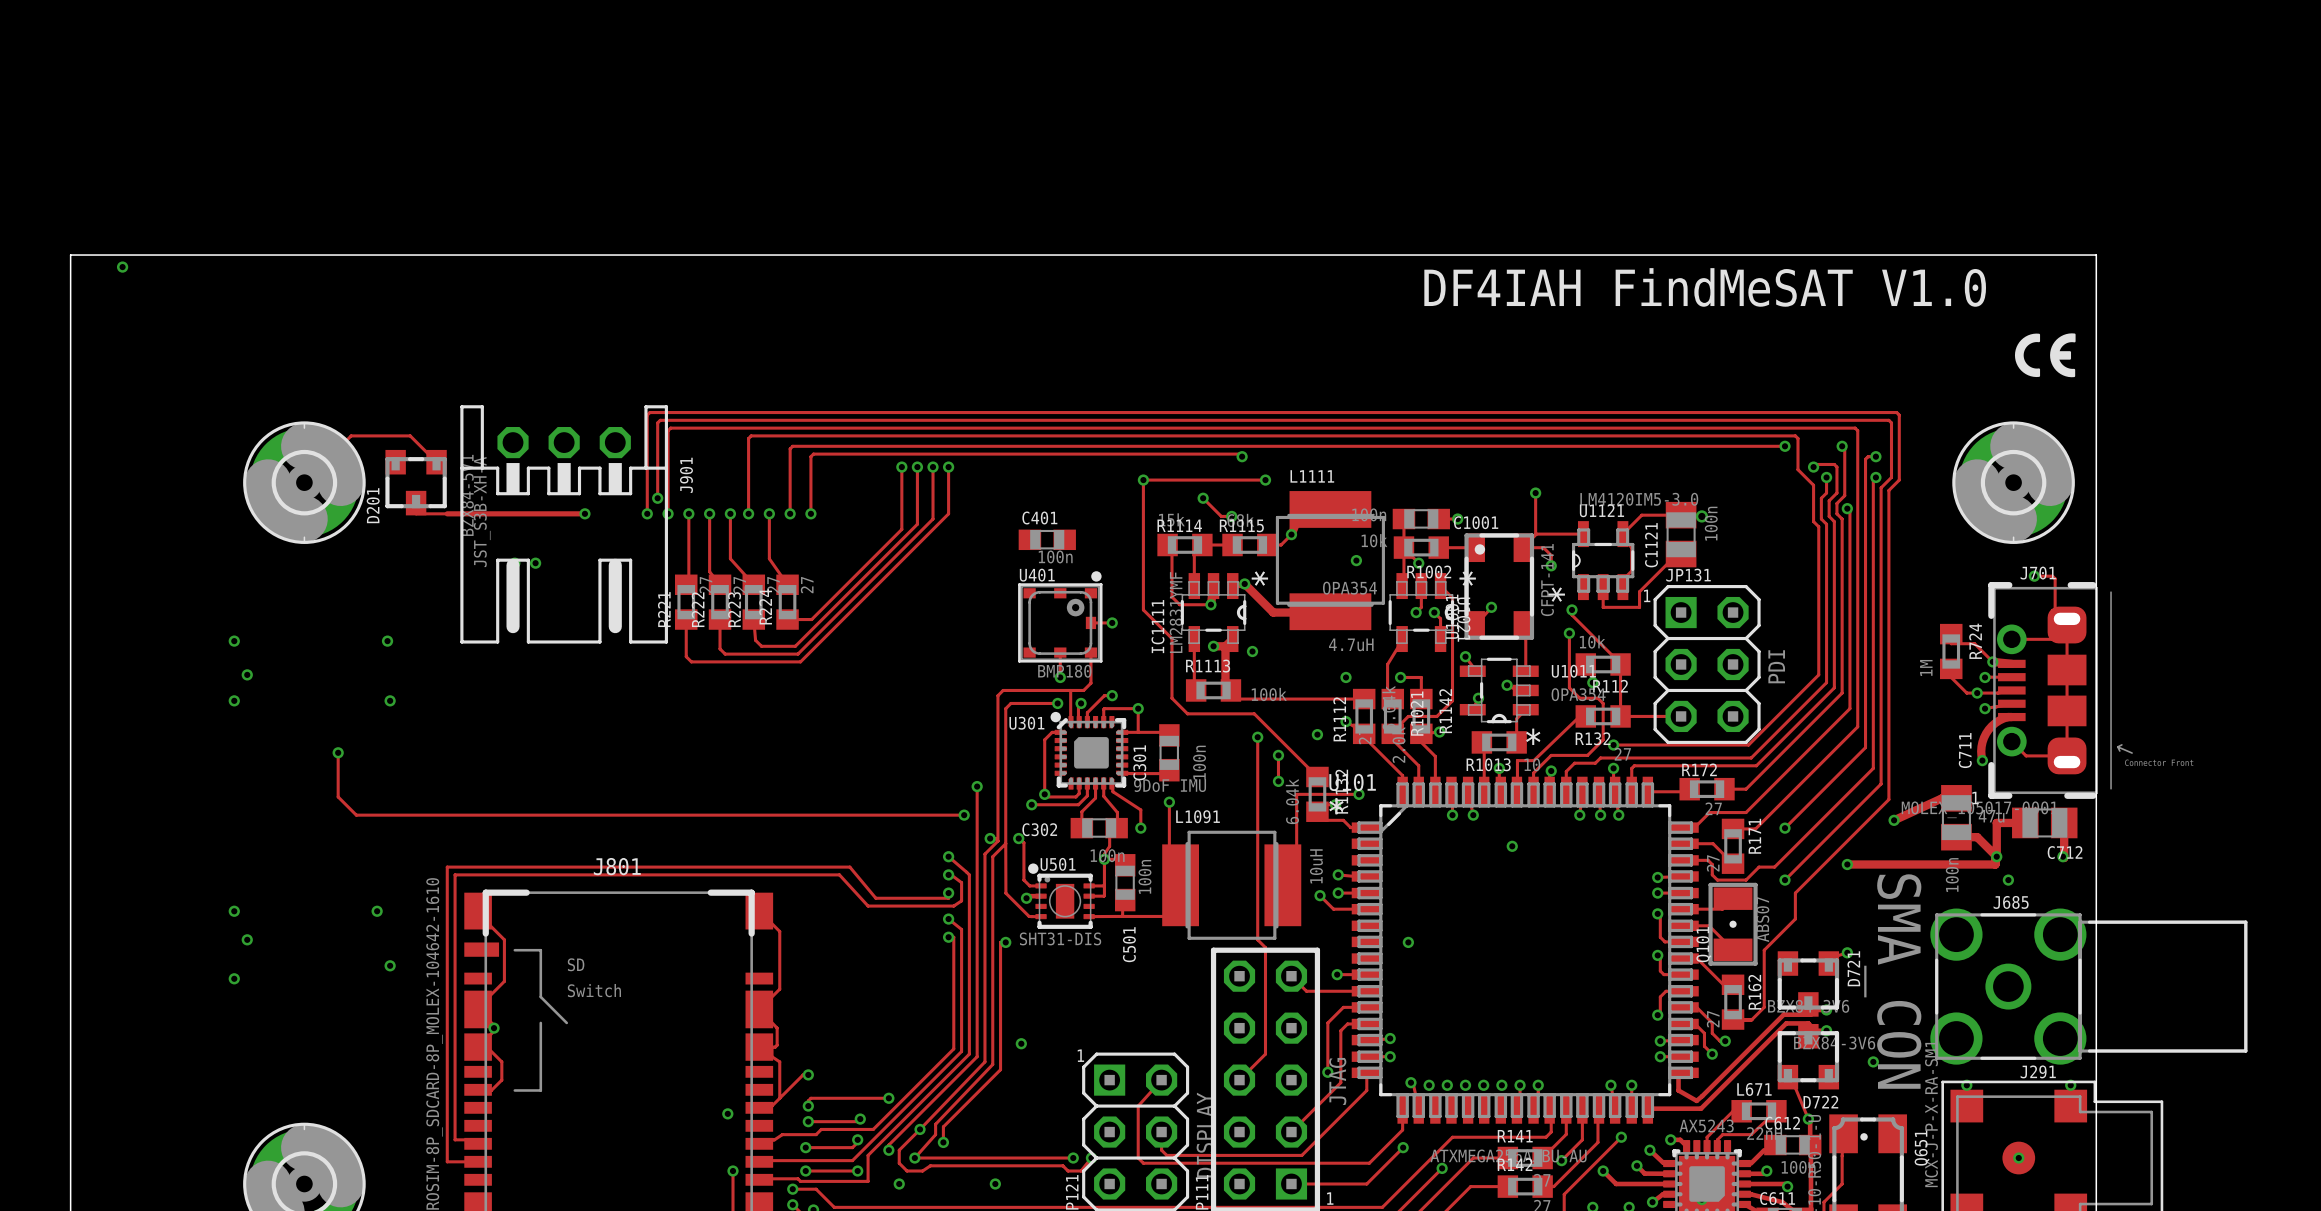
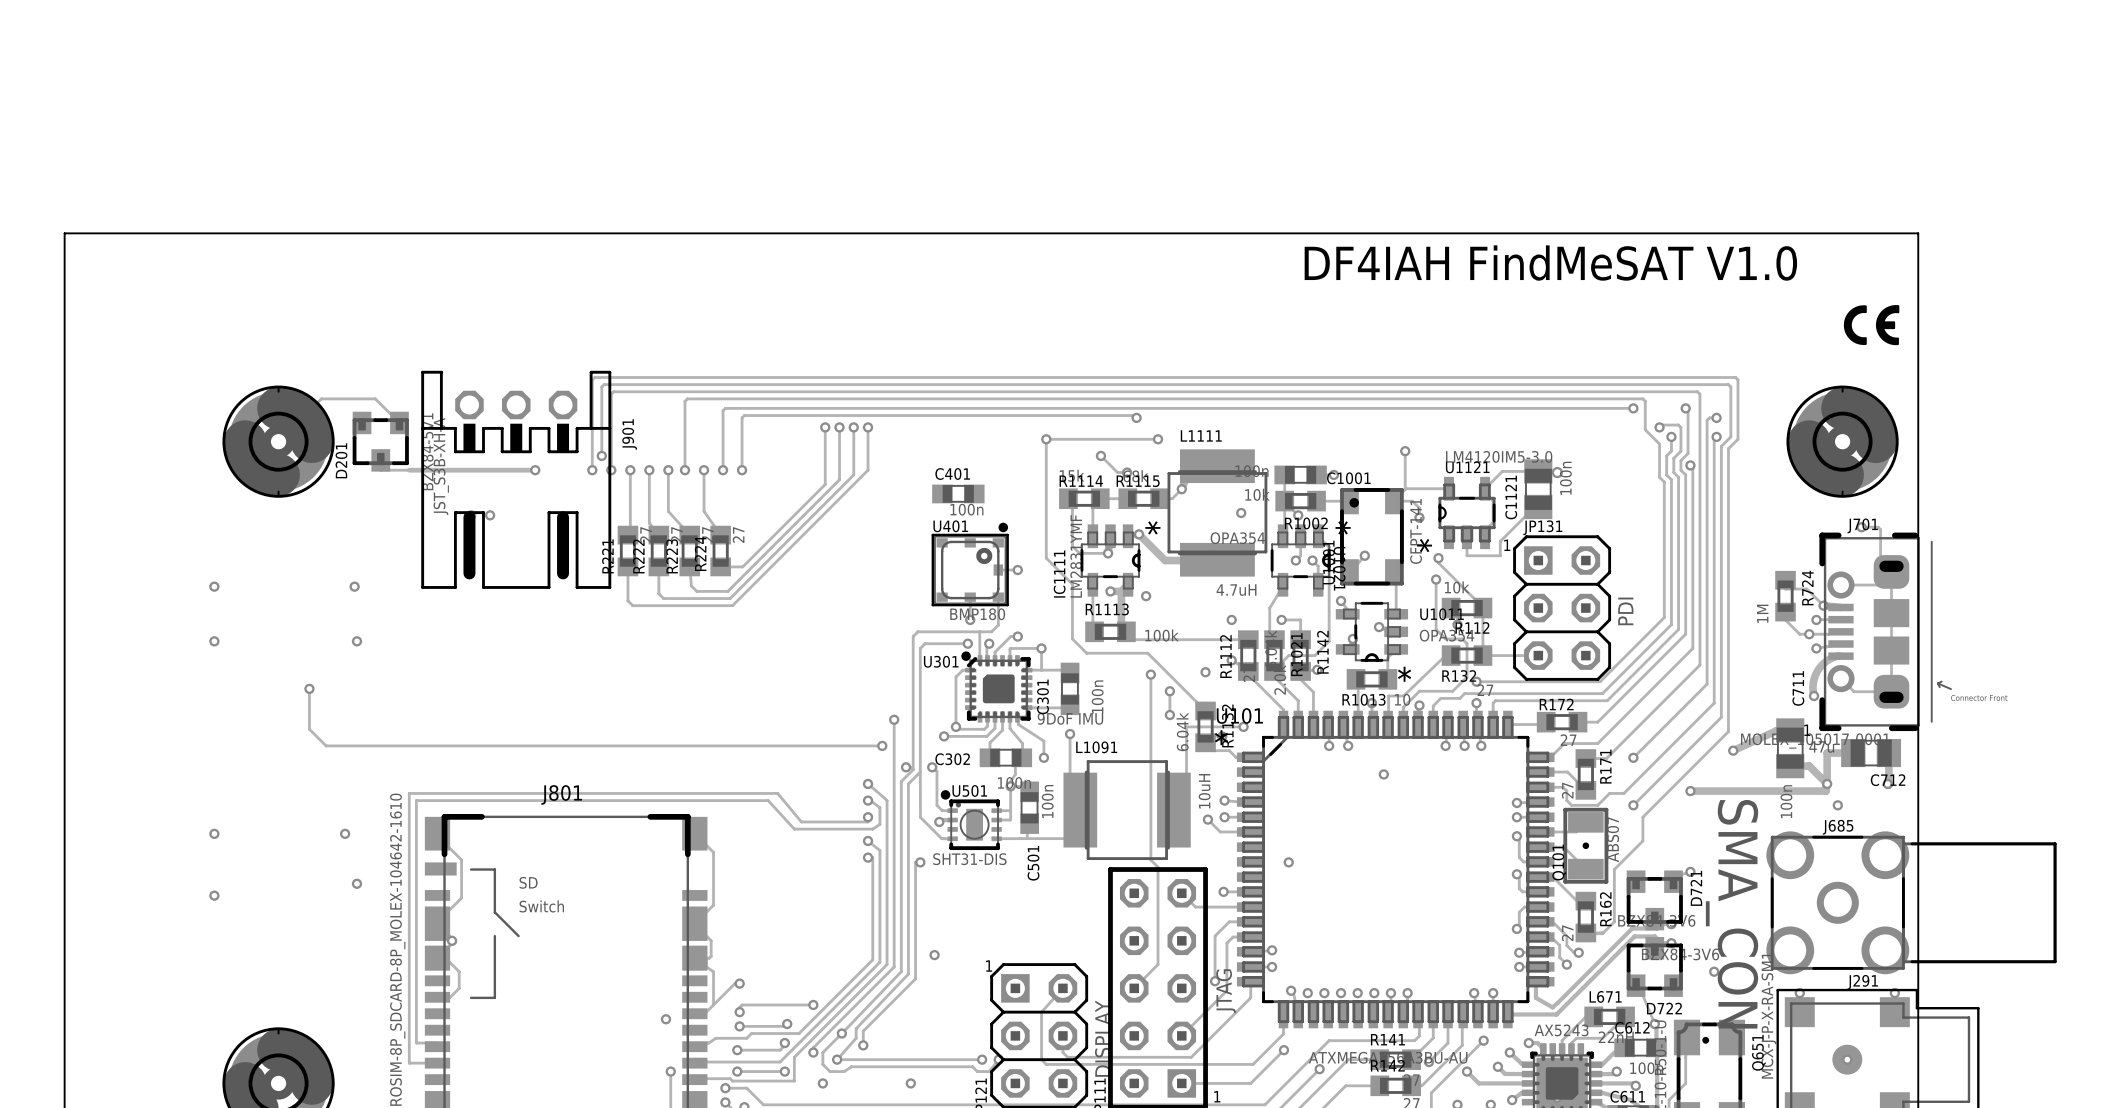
via: (122, 267) -> none
via: (247, 674) -> none
via: (247, 939) -> none

